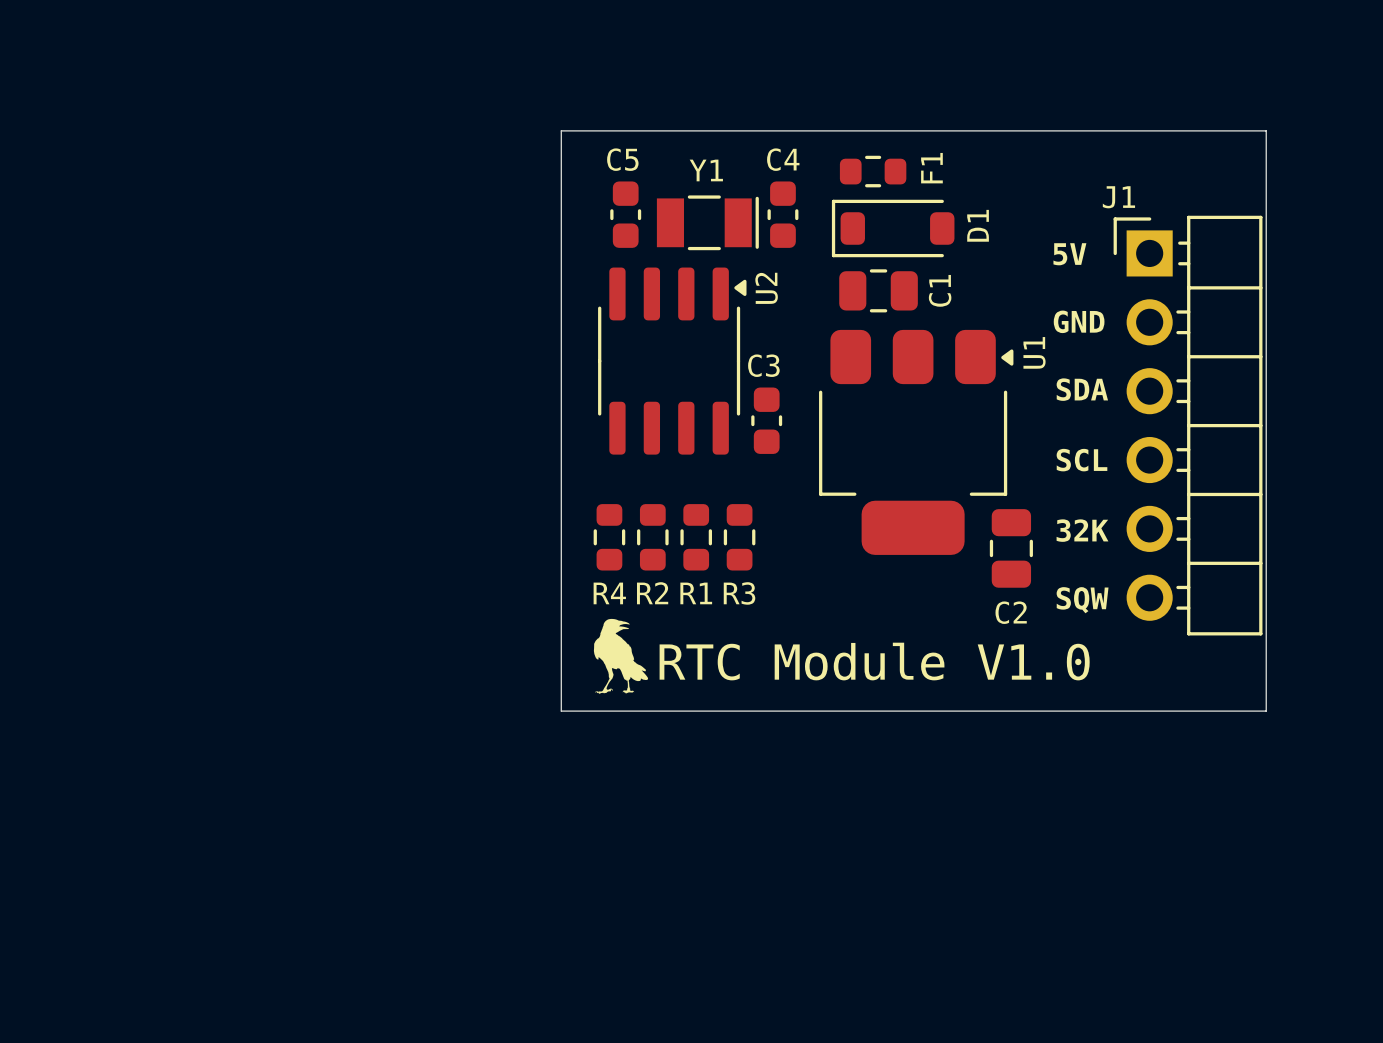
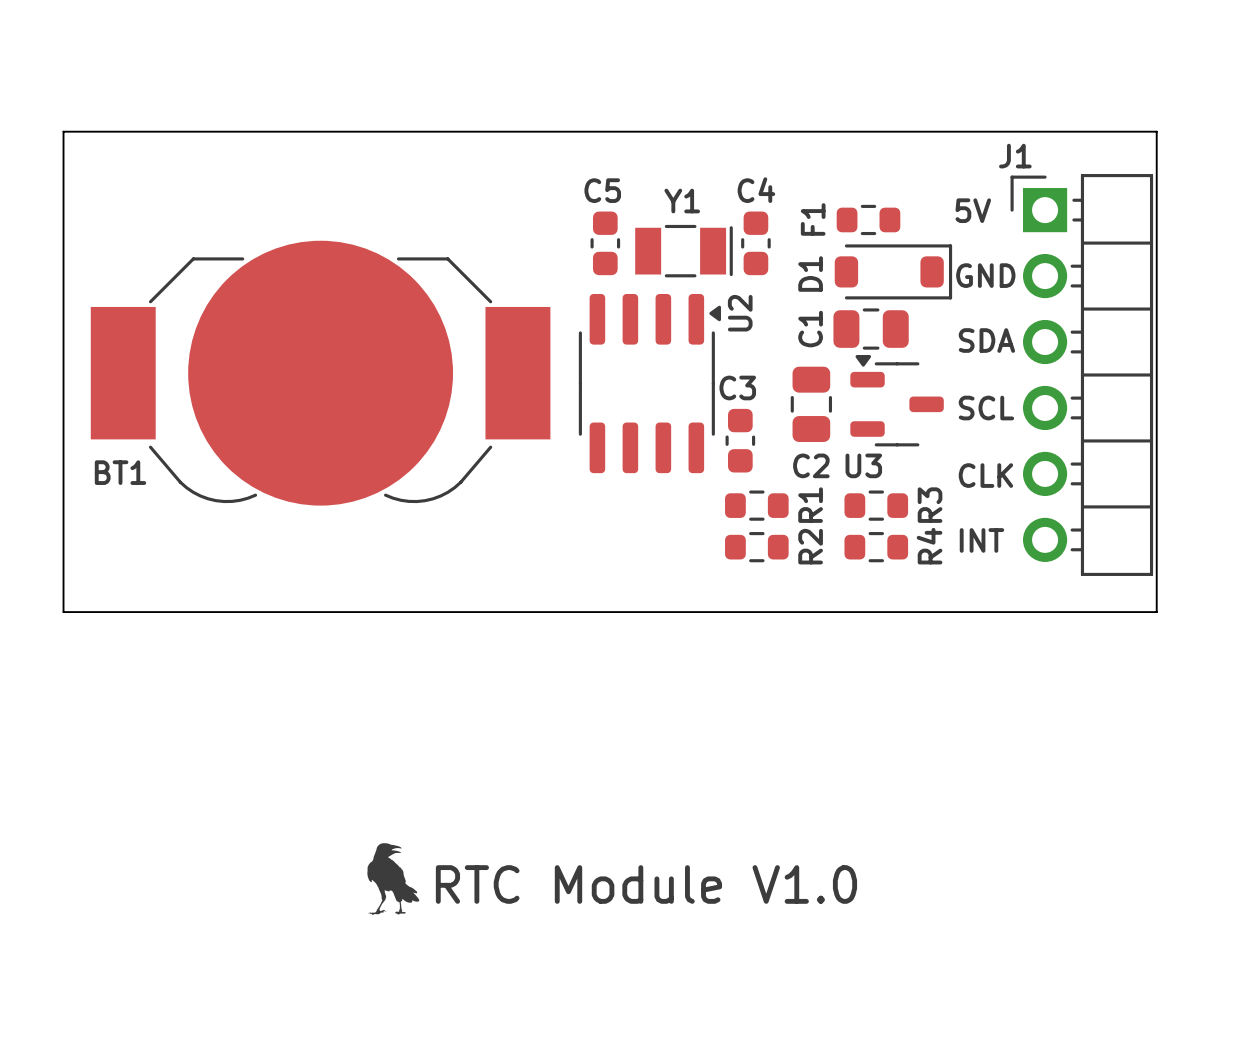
F1 name position: F1 (931, 168) -> F1 (813, 219)
F1 position: (873, 171) -> (868, 219)
board edge: (1266, 171) (1266, 130) (561, 130) (561, 711) (1266, 711) (1266, 673) -> (1156, 131) (63, 131) (63, 612) (1156, 612)
C5 position: (625, 214) -> (605, 243)
C4 position: (782, 214) -> (755, 243)
Y1 position: (707, 222) -> (684, 251)
D1 rotation: 0° (893, 228) -> 180° (893, 271)
D1 position: (893, 228) -> (893, 271)
C1 position: (878, 290) -> (871, 329)
C1 name position: C1 (940, 290) -> C1 (810, 329)
U2 position: (672, 361) -> (649, 383)
C3 position: (766, 420) -> (740, 440)
BT1: none -> (320, 373)
U1: (916, 442) -> none
U3: none -> (897, 400)
text: 32K (1082, 530) -> CLK (985, 475)
R4 rotation: 0° (609, 537) -> 90° clockwise (876, 547)
R4 position: (609, 537) -> (876, 547)
R2 rotation: 0° (652, 537) -> 90° clockwise (756, 547)
R2 position: (652, 537) -> (756, 547)
R1 rotation: 0° (696, 537) -> 90° clockwise (756, 505)
R1 position: (696, 537) -> (756, 505)
R3 rotation: 0° (739, 537) -> 90° clockwise (876, 505)
R3 position: (739, 537) -> (876, 505)
C2 position: (1011, 548) -> (811, 404)
R4 name position: R4 (609, 593) -> R4 (929, 546)
R2 name position: R2 (652, 593) -> R2 (810, 546)
R1 name position: R1 (696, 593) -> R1 (810, 505)
R3 name position: R3 (739, 593) -> R3 (930, 505)
text: SQW (1082, 600) -> INT (981, 540)
drawing position: (620, 656) -> (393, 879)
text position: RTC Module V1.0 (874, 661) -> RTC Module V1.0 (646, 884)

